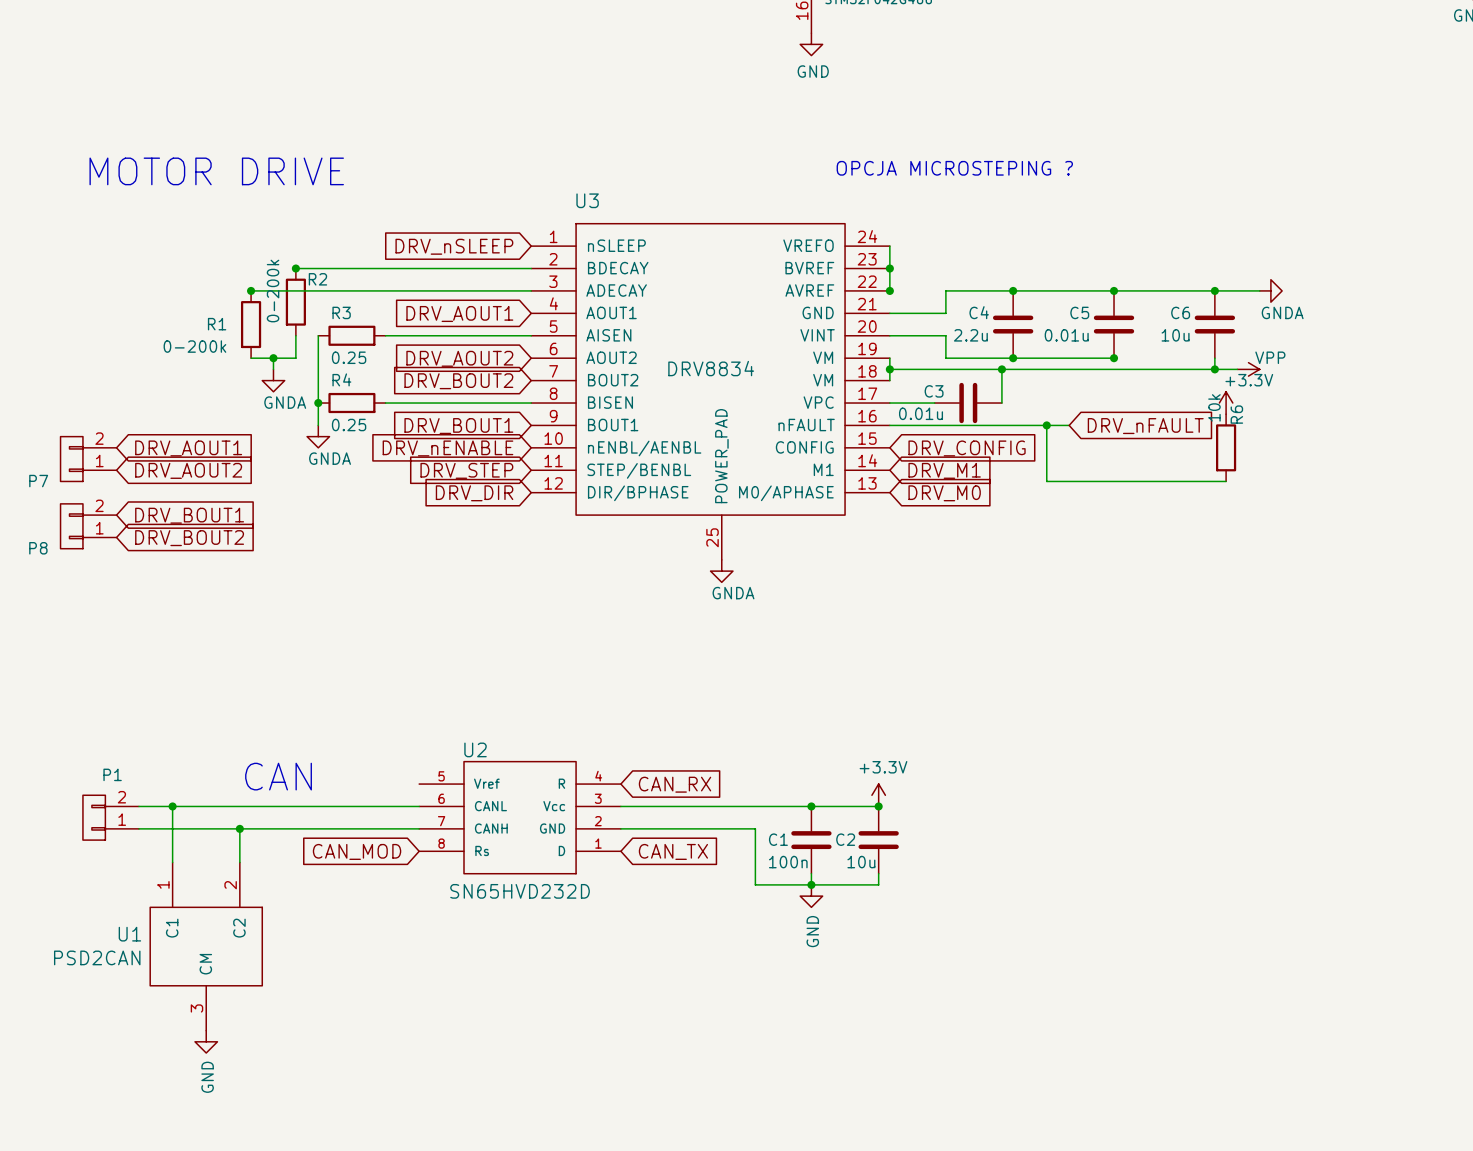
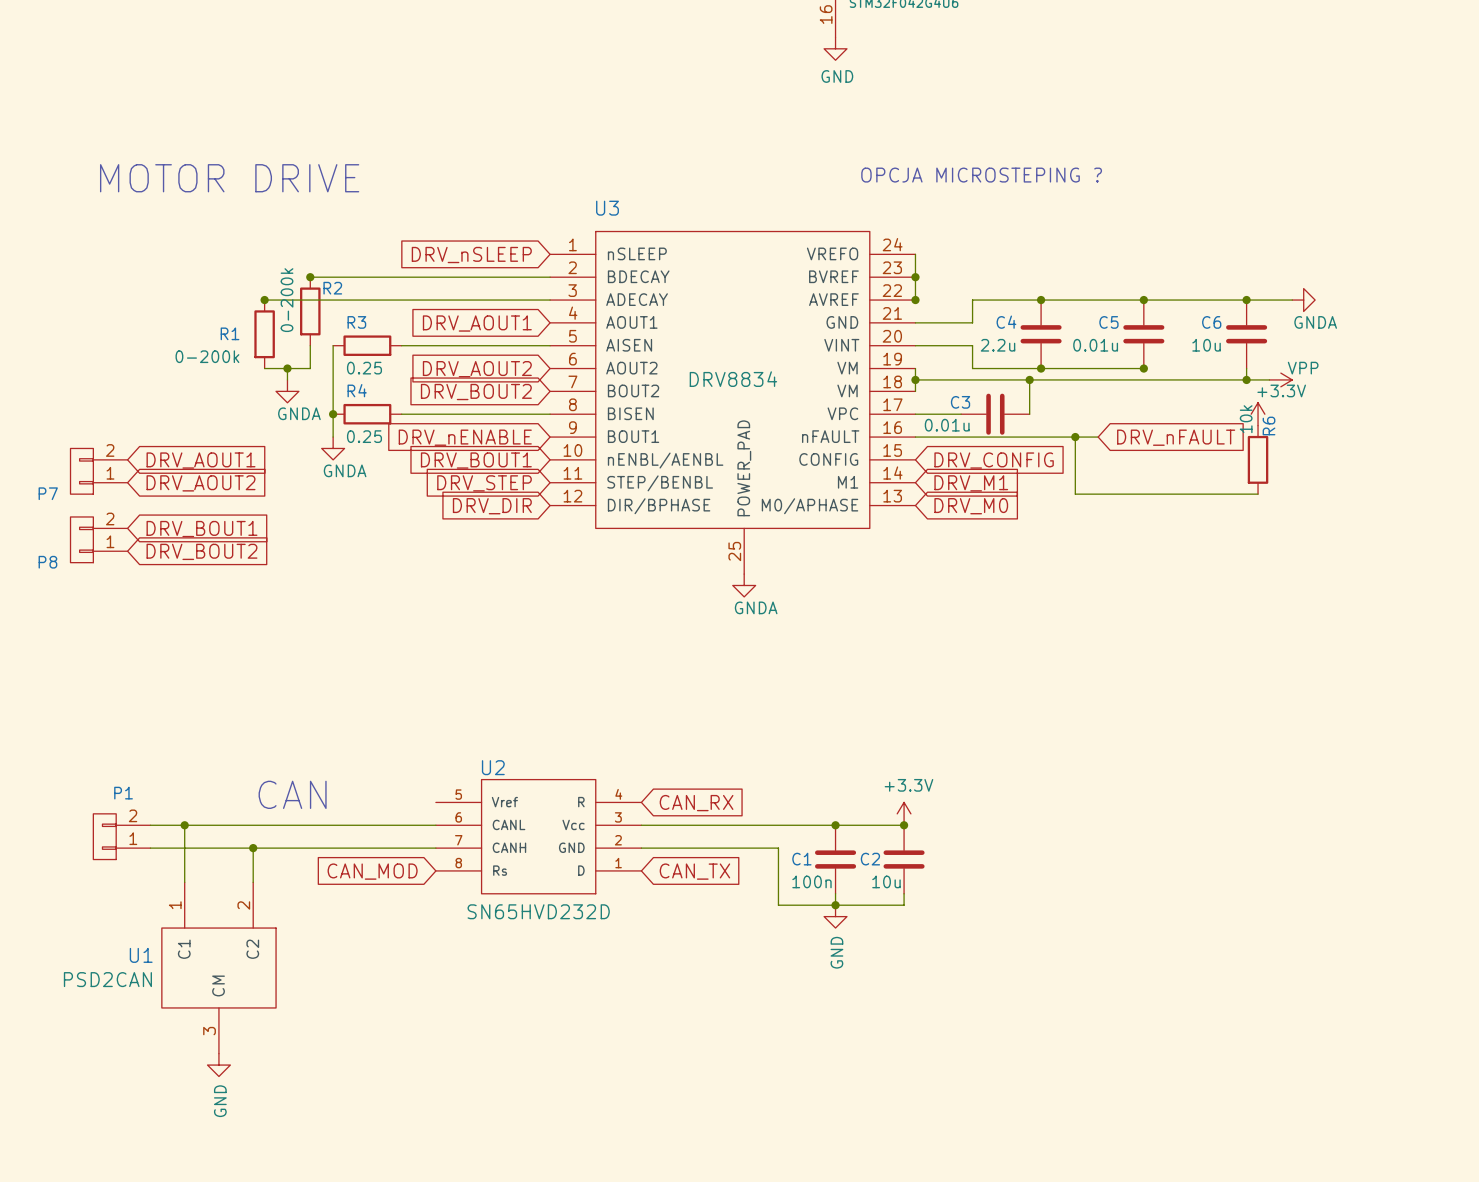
global label: DRV_BOUT1 (458, 426) -> DRV_nENABLE (465, 437)
global label: DRV_nENABLE (447, 448) -> DRV_BOUT1 (476, 460)

